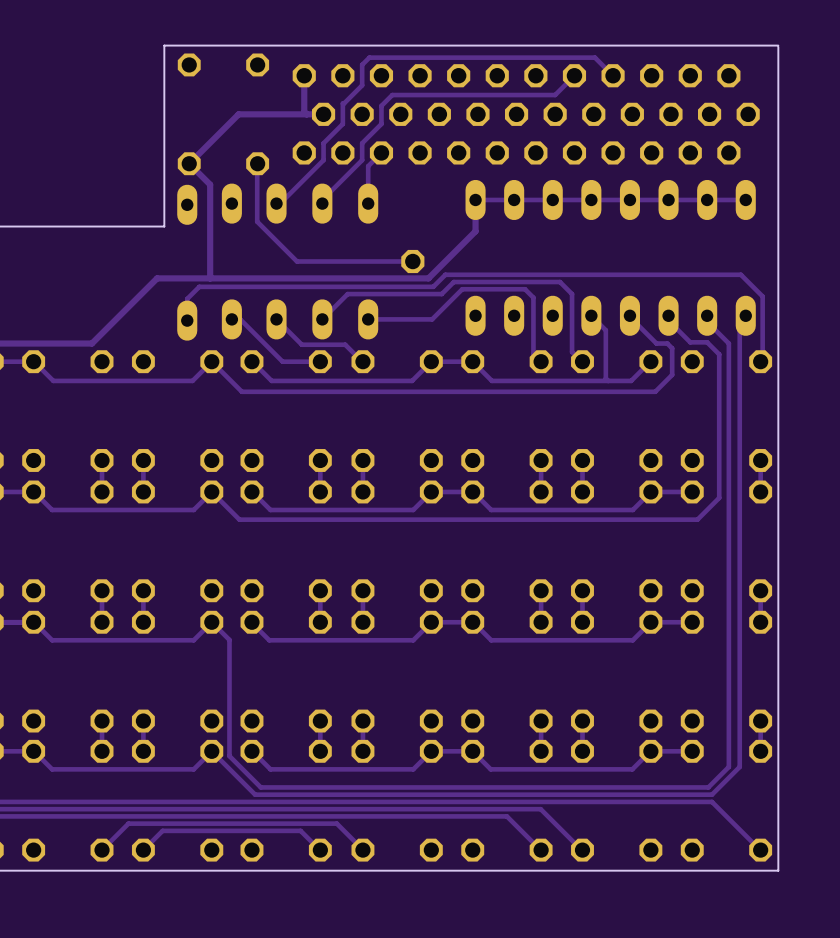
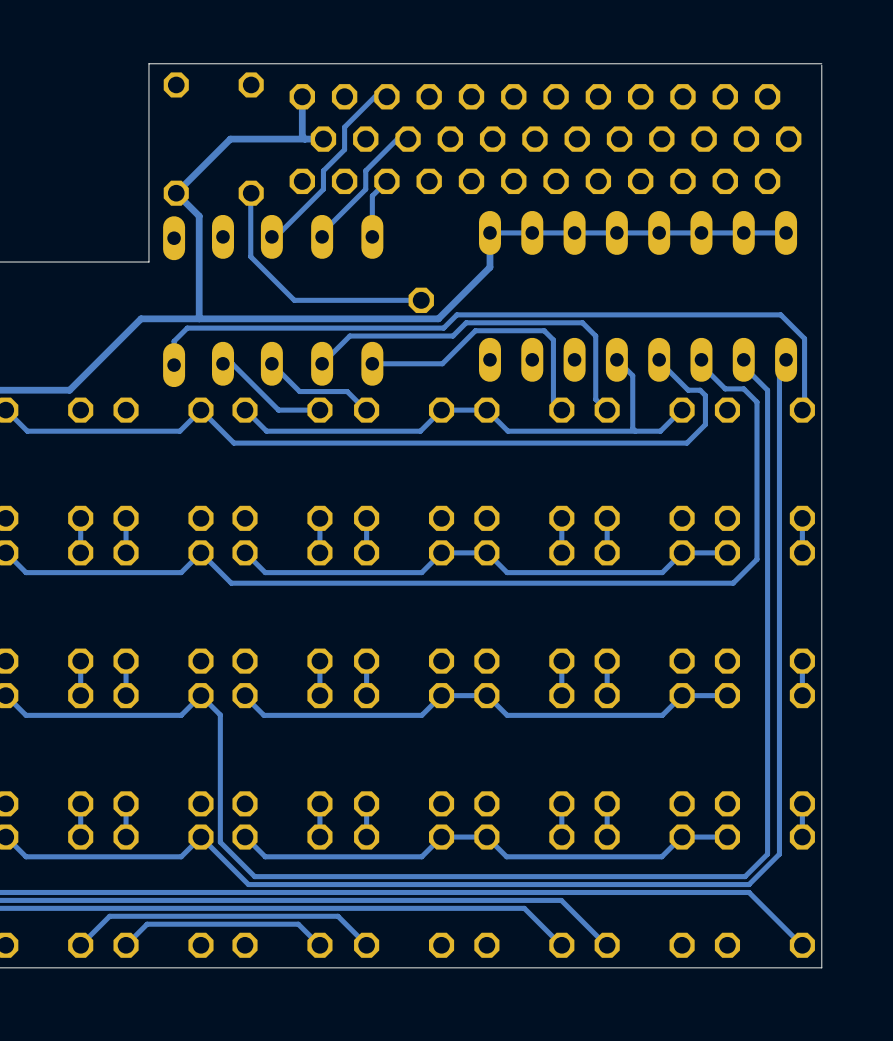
track: (574, 75) (555, 95) (392, 95) (381, 105) (381, 123) -> (408, 139) (397, 139) (386, 149)
track: (613, 75) (594, 57) (369, 57) (362, 64) (362, 85) (342, 103) -> (386, 96) (375, 96) (344, 127)

